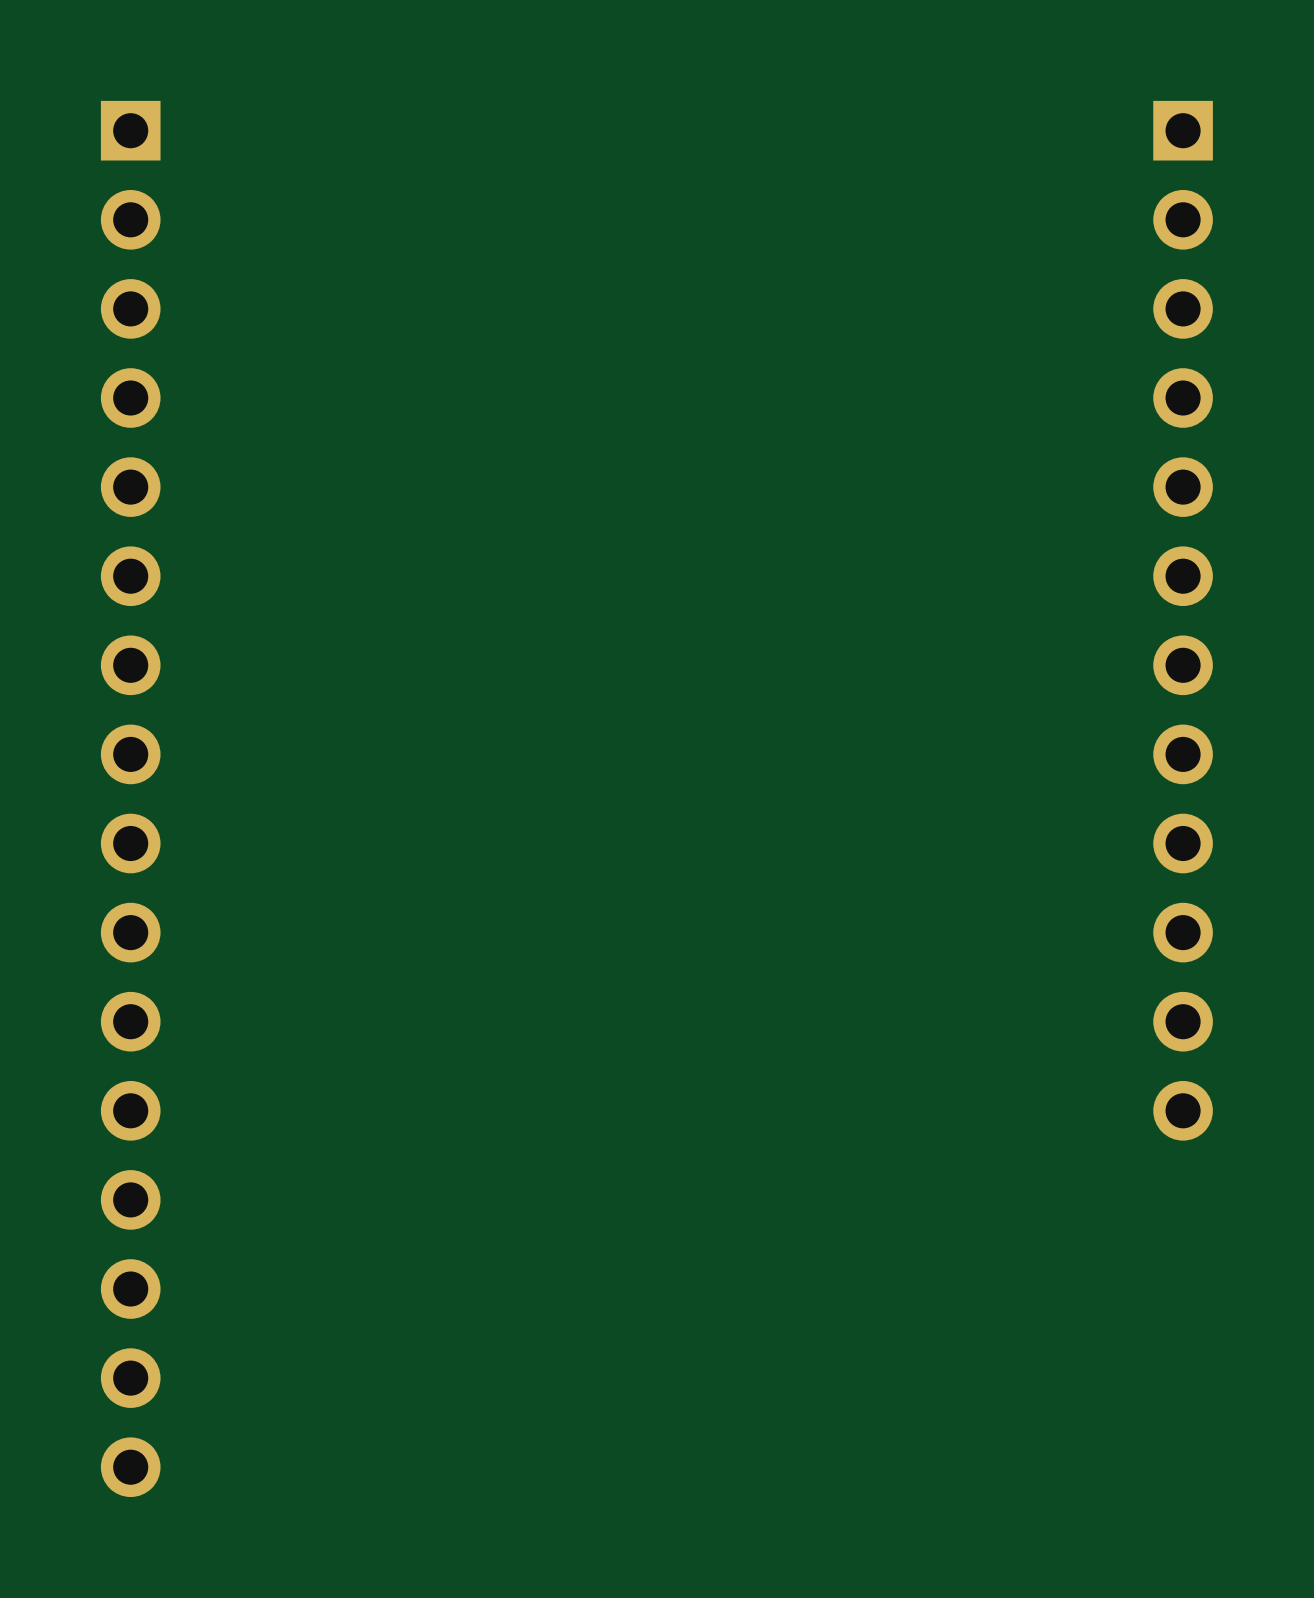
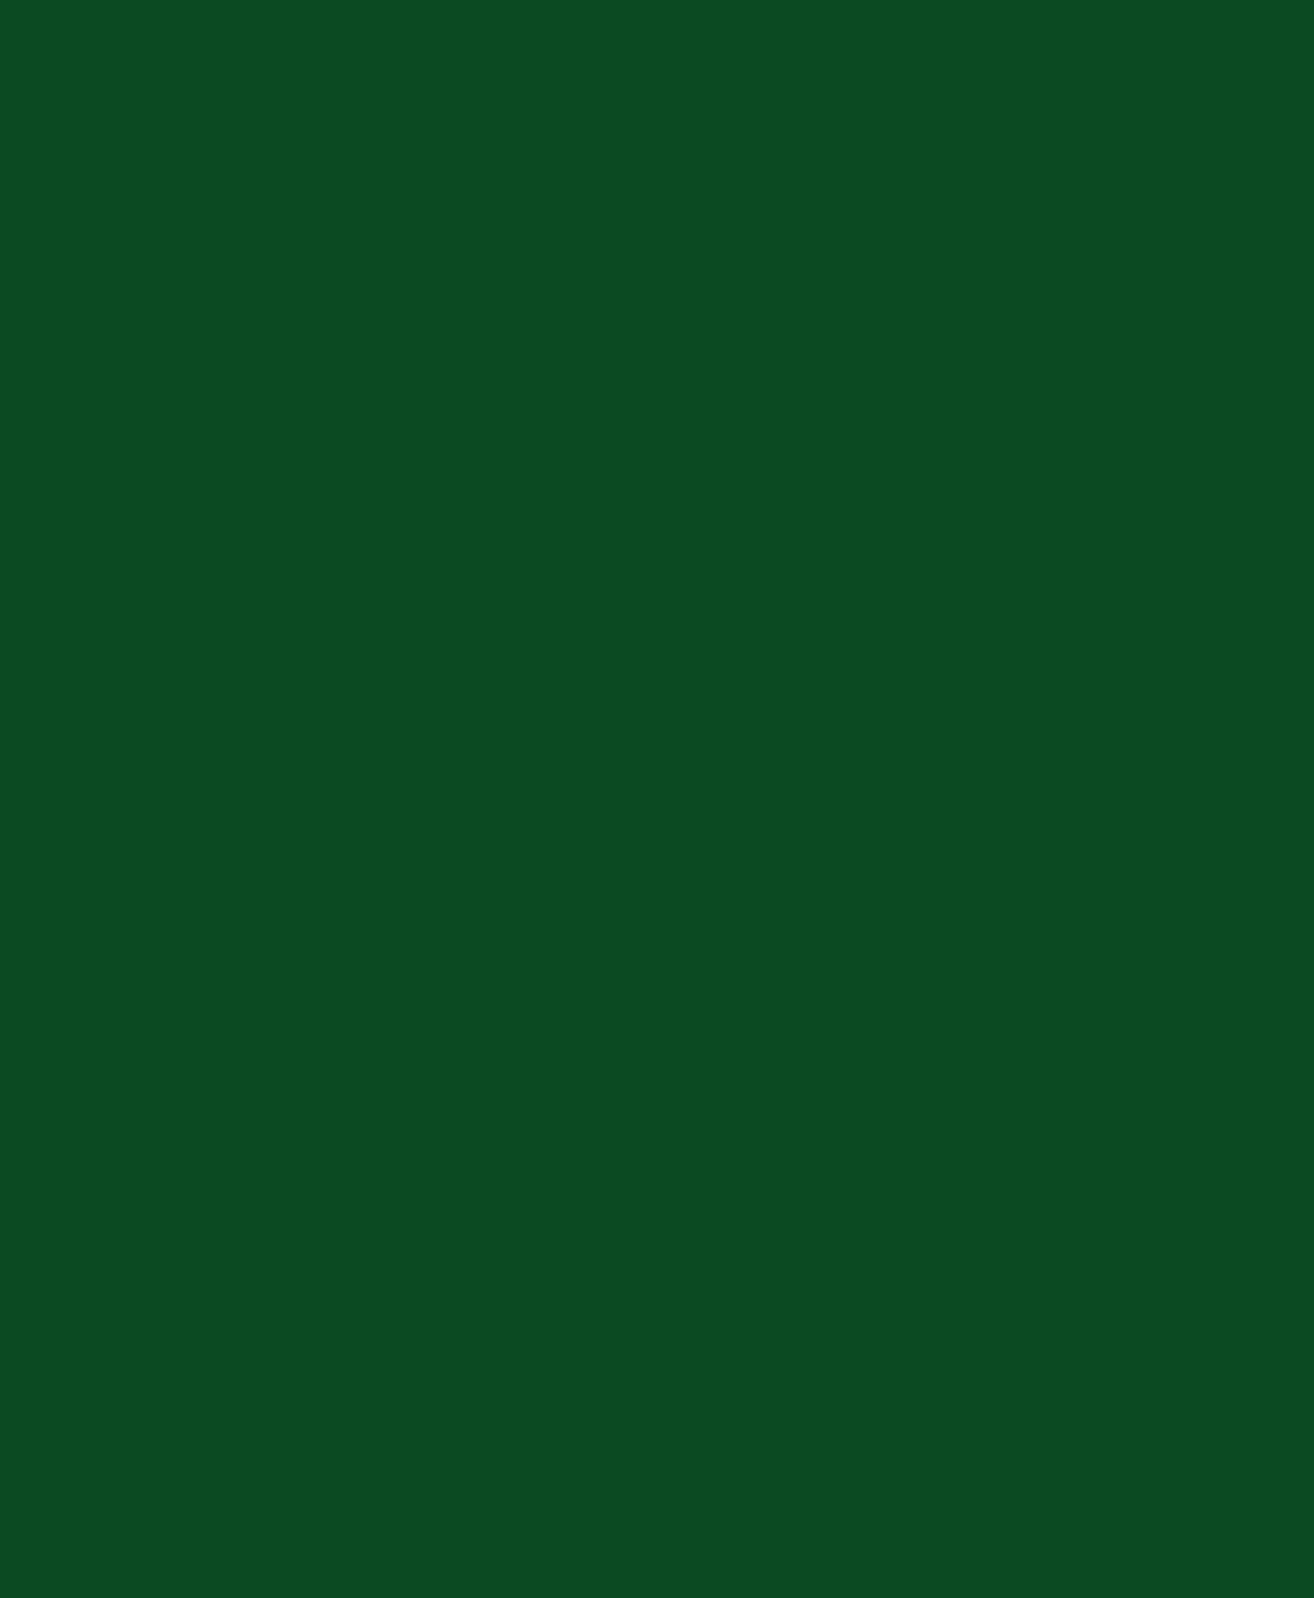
part: (1183, 620) -> none
part: (130, 798) -> none

